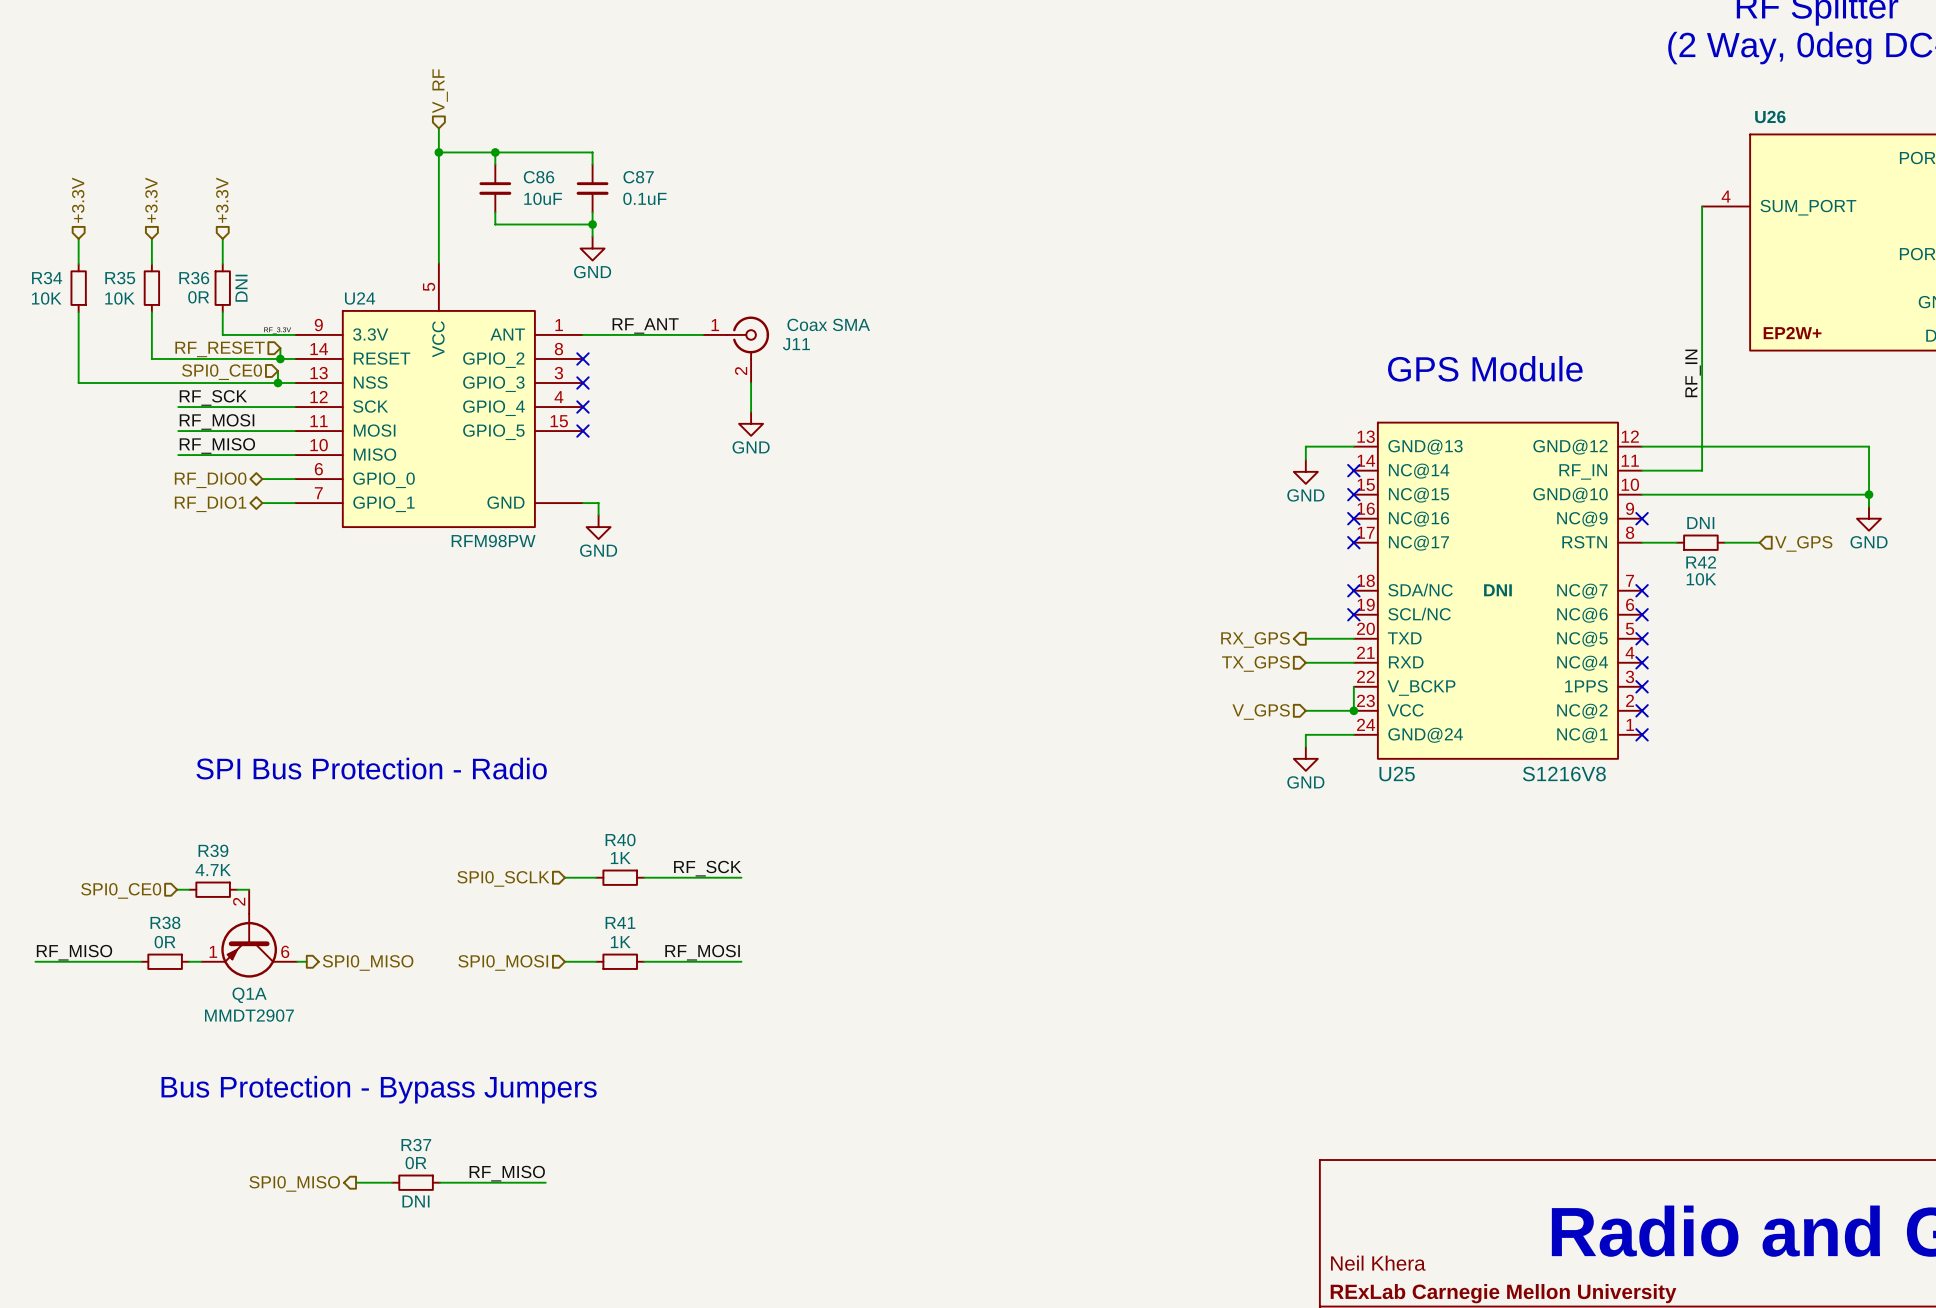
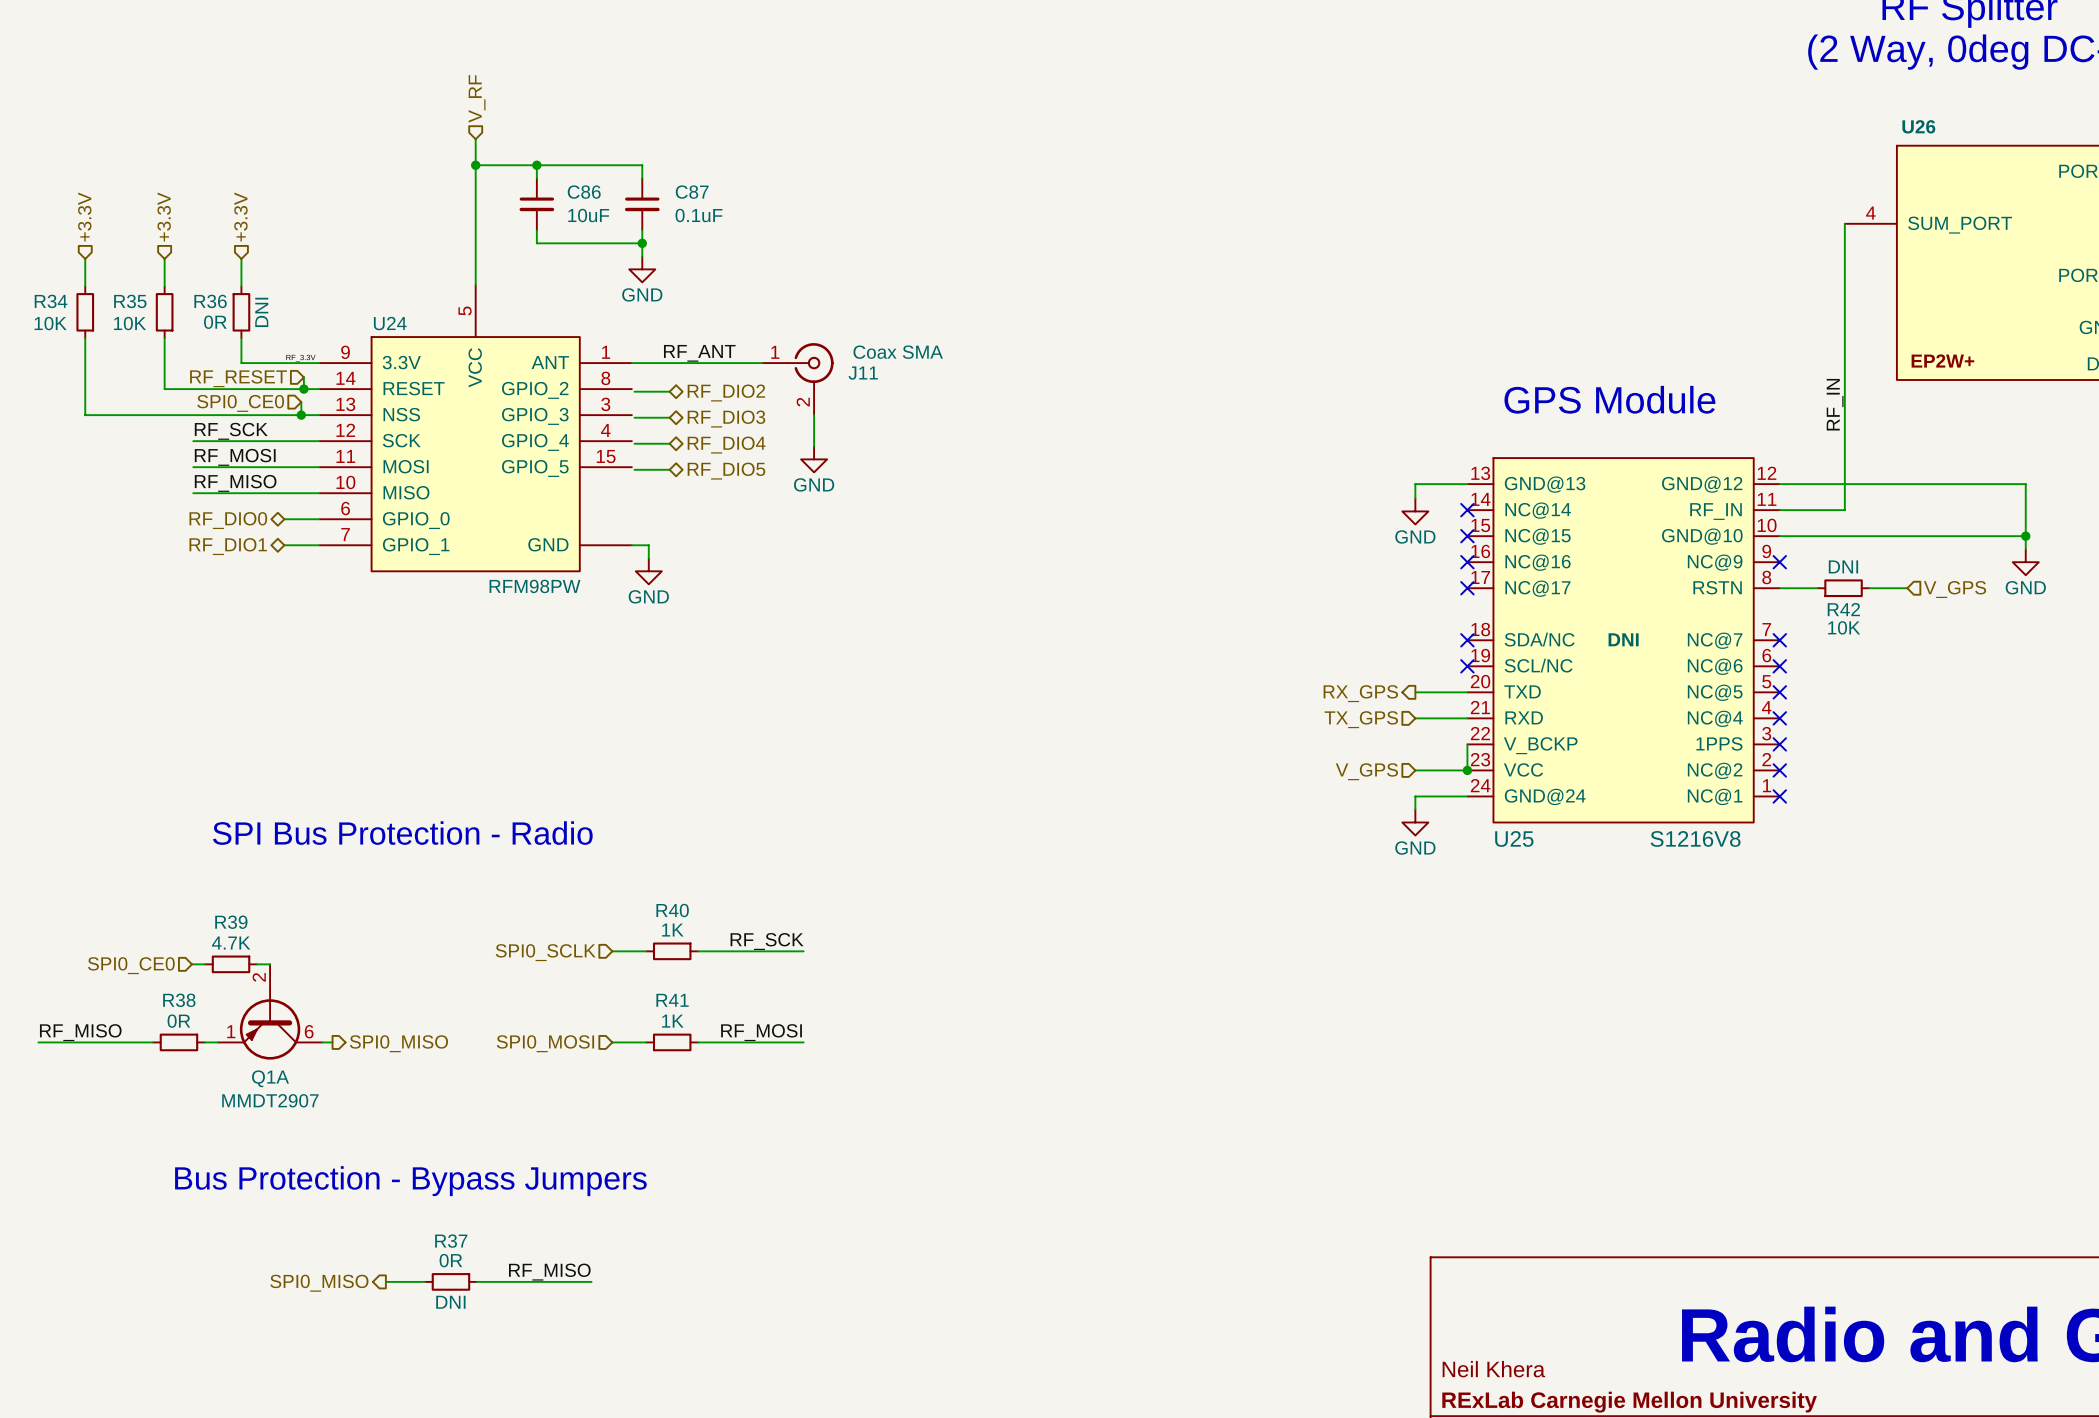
no-connect mark: (582, 358) -> none
wire: none -> (634, 391) (669, 391)
hierarchical label: none -> RF_DIO2 (726, 392)
no-connect mark: (582, 383) -> none
wire: none -> (634, 417) (669, 417)
hierarchical label: none -> RF_DIO3 (726, 419)
no-connect mark: (582, 407) -> none
wire: none -> (634, 443) (669, 443)
hierarchical label: none -> RF_DIO4 (726, 445)
no-connect mark: (582, 431) -> none
wire: none -> (634, 469) (669, 469)
hierarchical label: none -> RF_DIO5 (726, 471)

